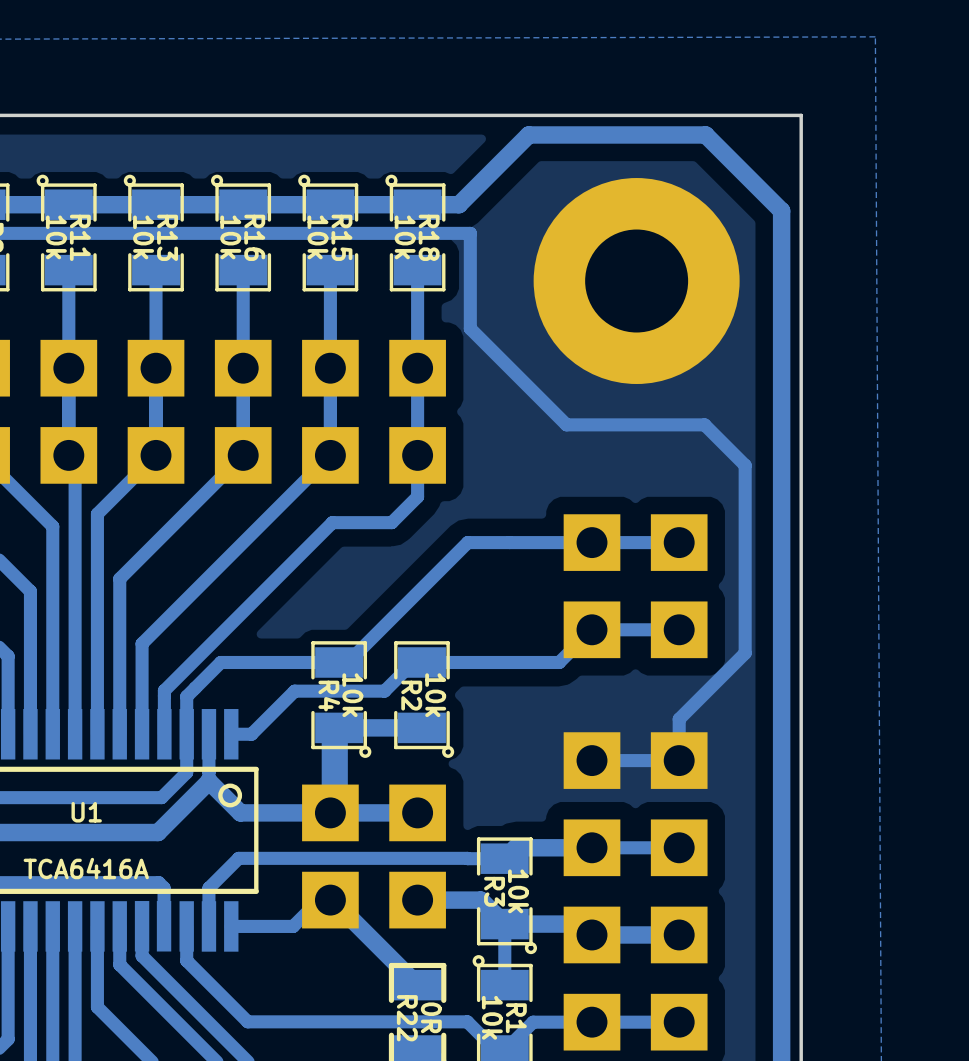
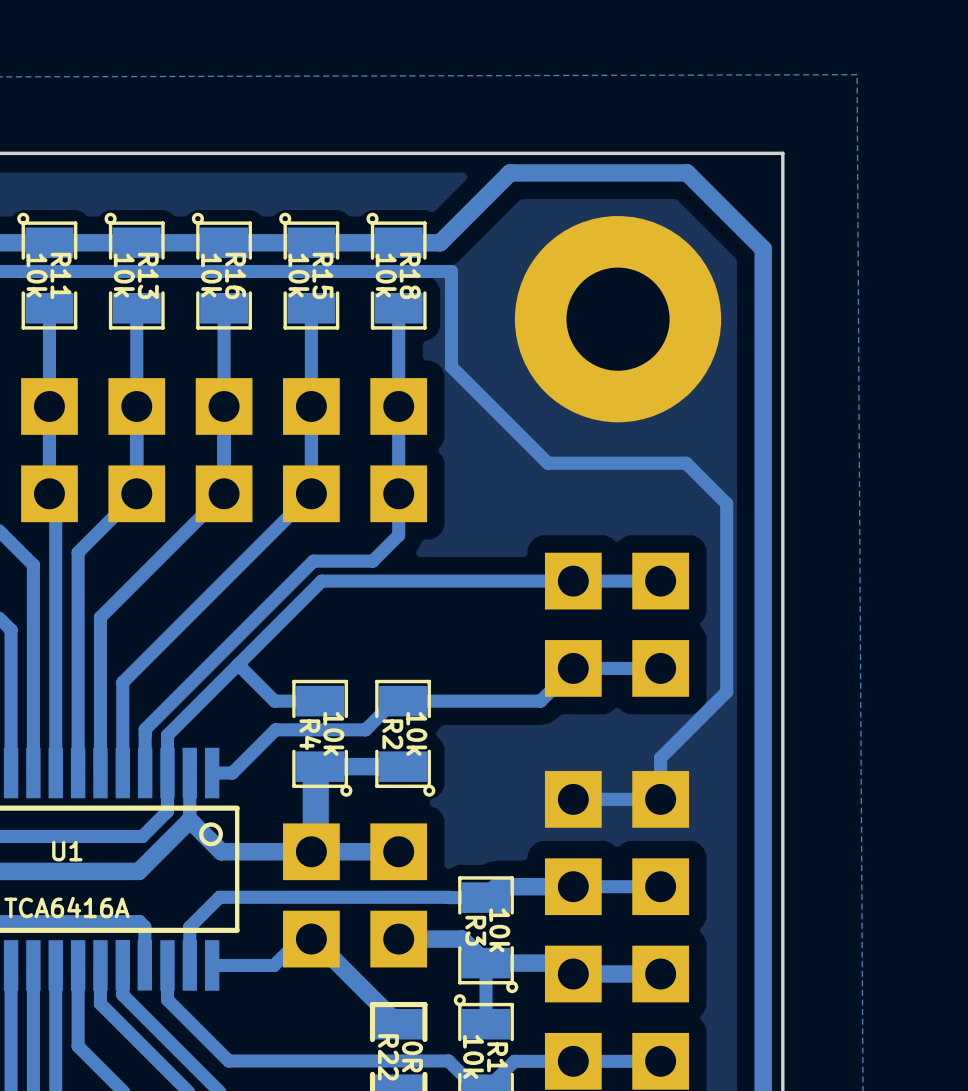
bottom track: (467, 542) (347, 662) (339, 662) -> (448, 581) (321, 581) (201, 701)
bottom track: (293, 662) (220, 662) -> (274, 701) (238, 664)

